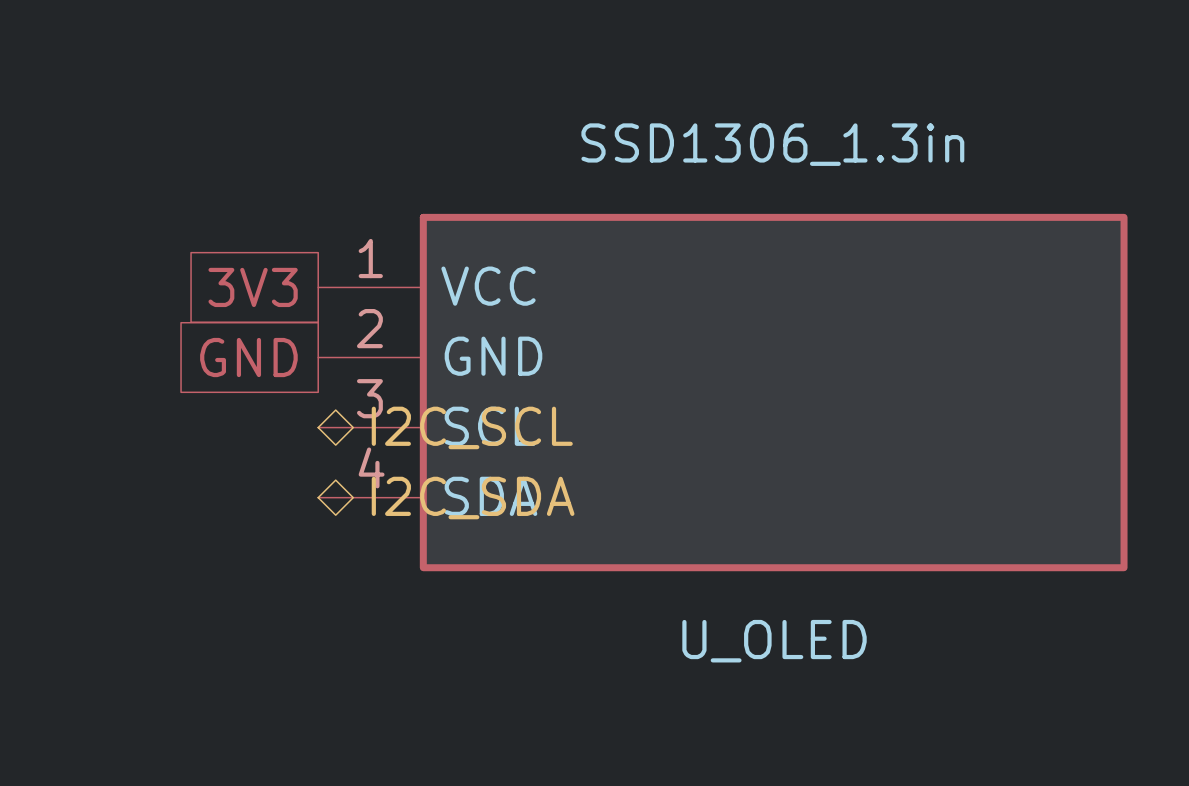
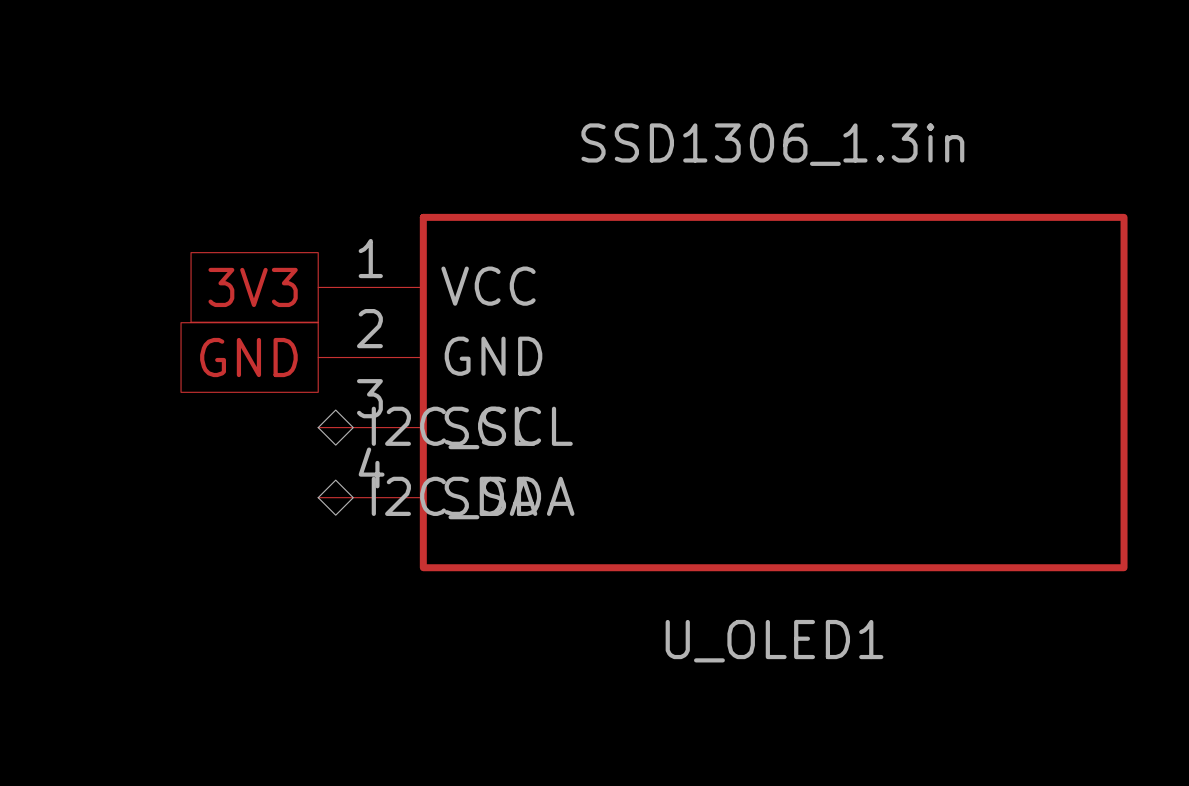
U_OLED name: U_OLED (774, 641) -> U_OLED1 (774, 641)

